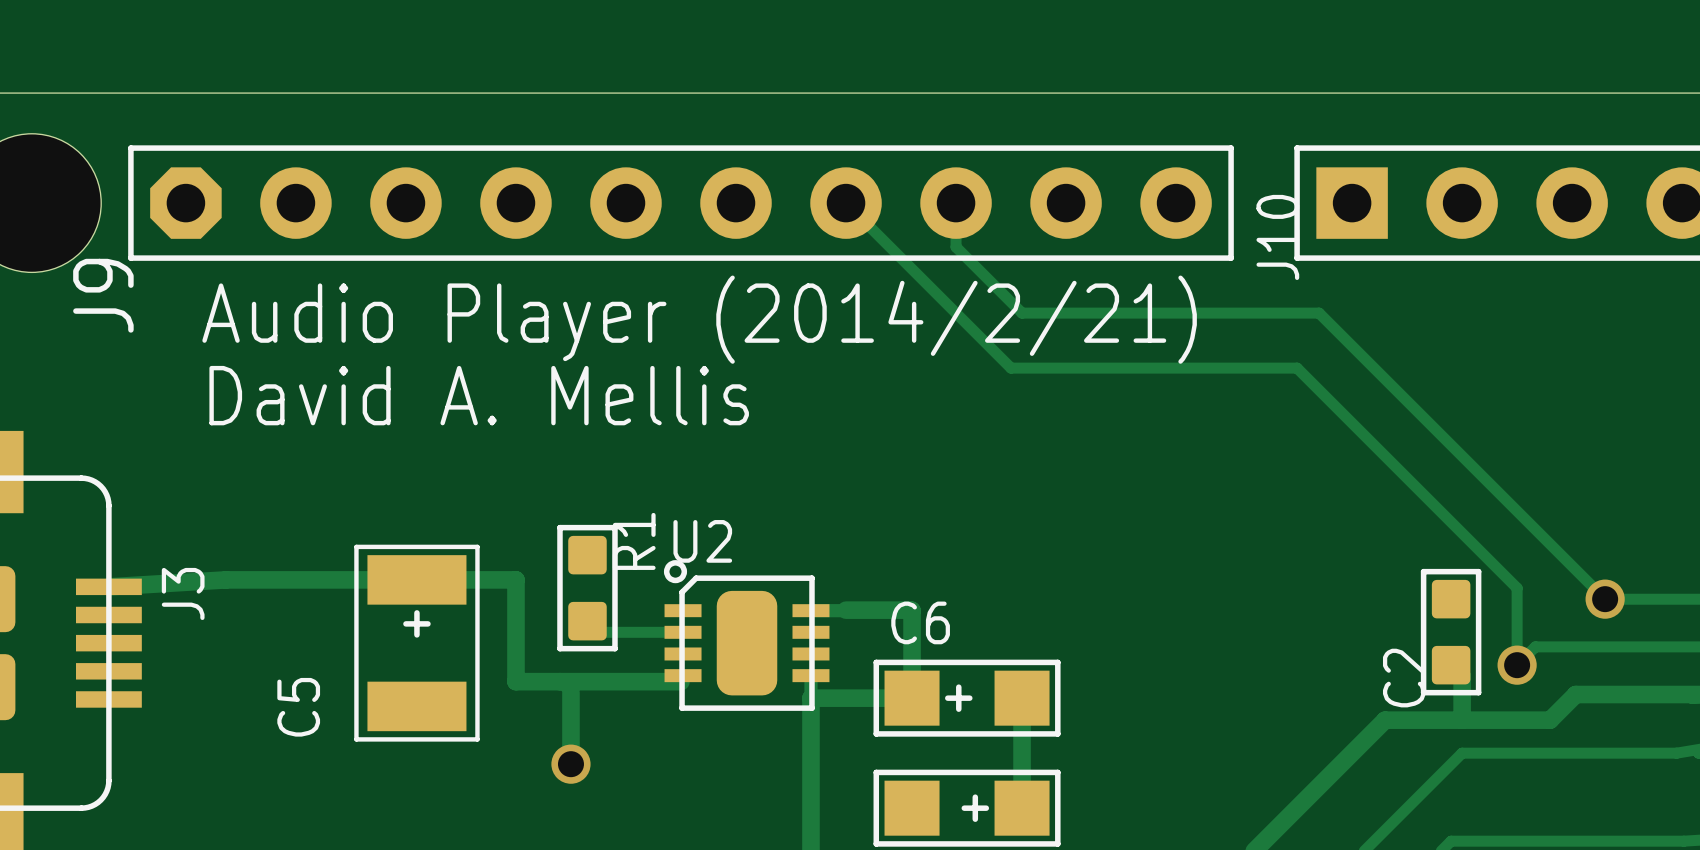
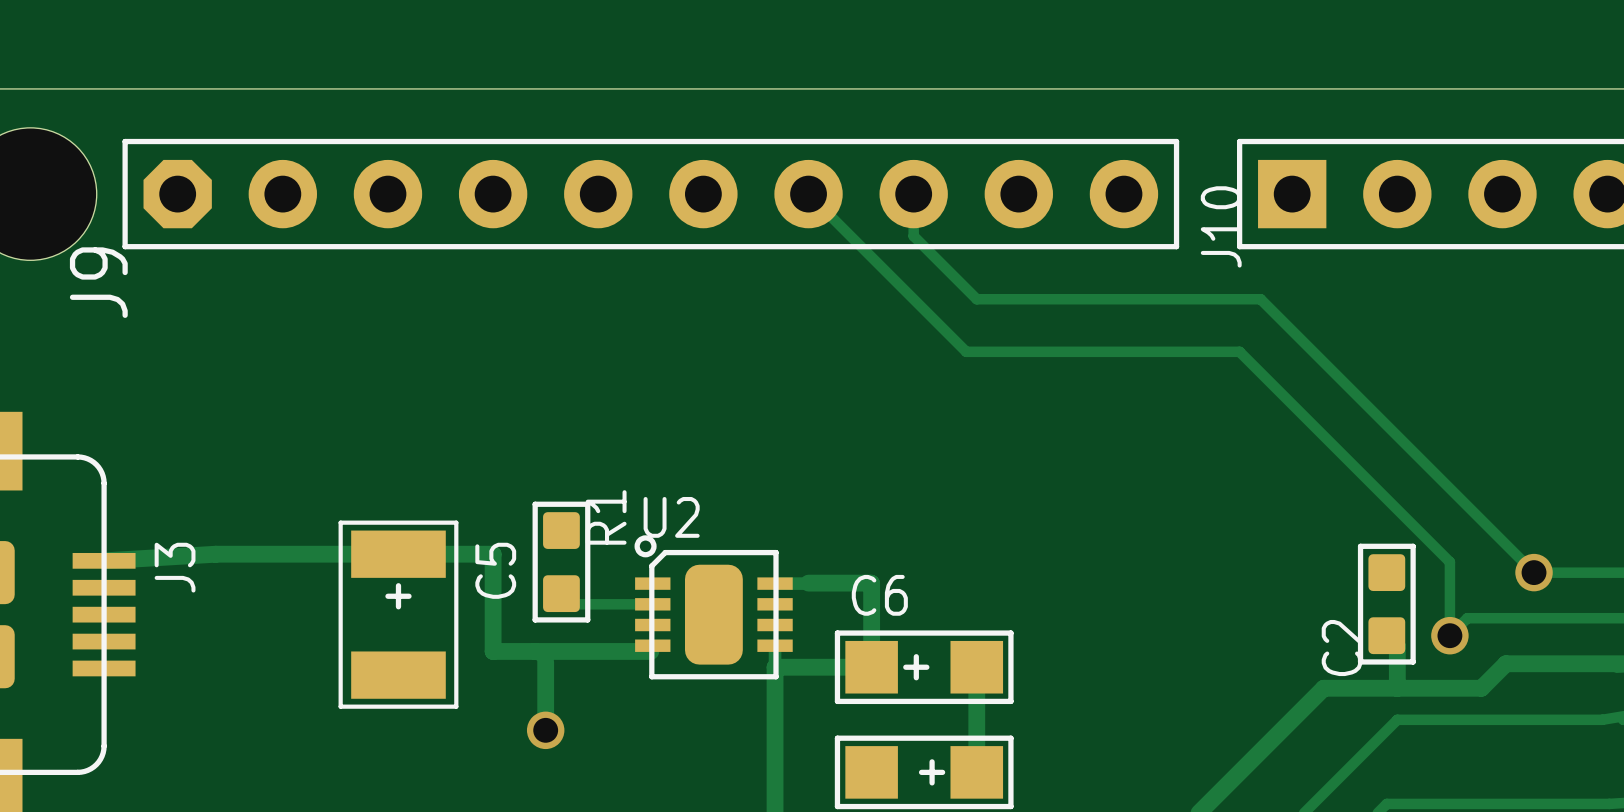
text: Audio Player (2014/2/21) (699, 319) -> none
text: David A. Mellis (479, 395) -> none
C5 name position: C5 (298, 707) -> C5 (495, 570)

